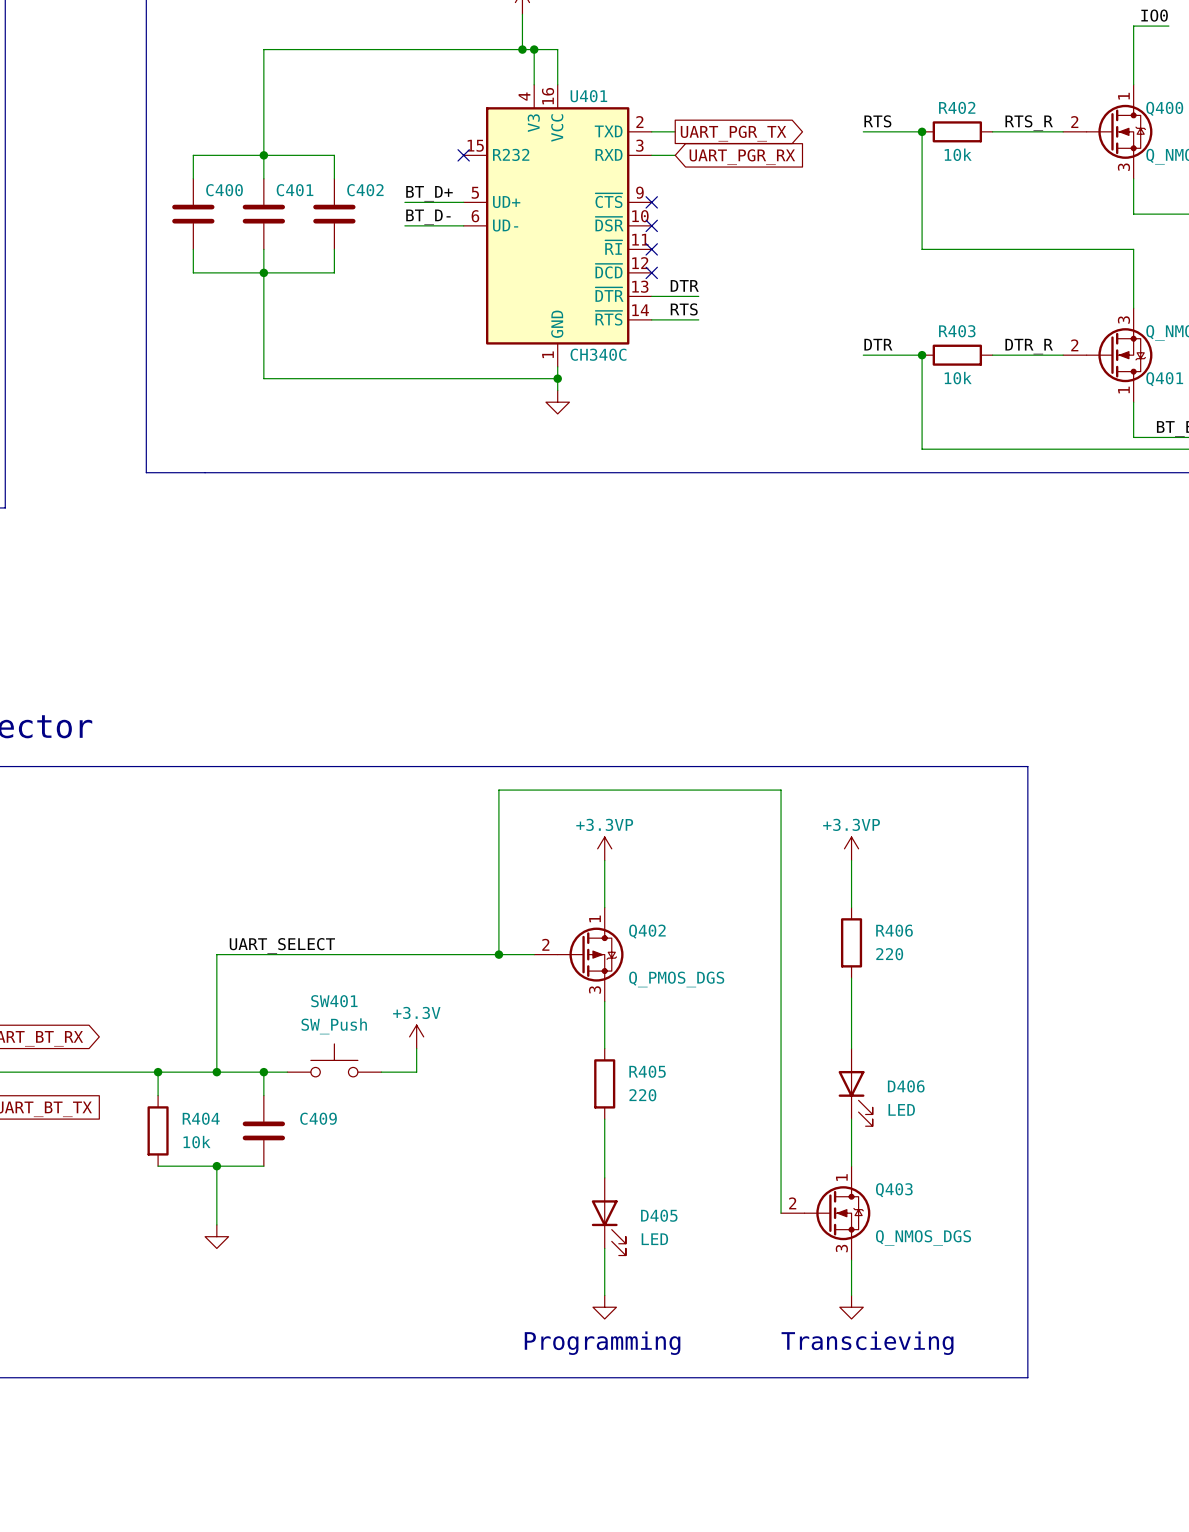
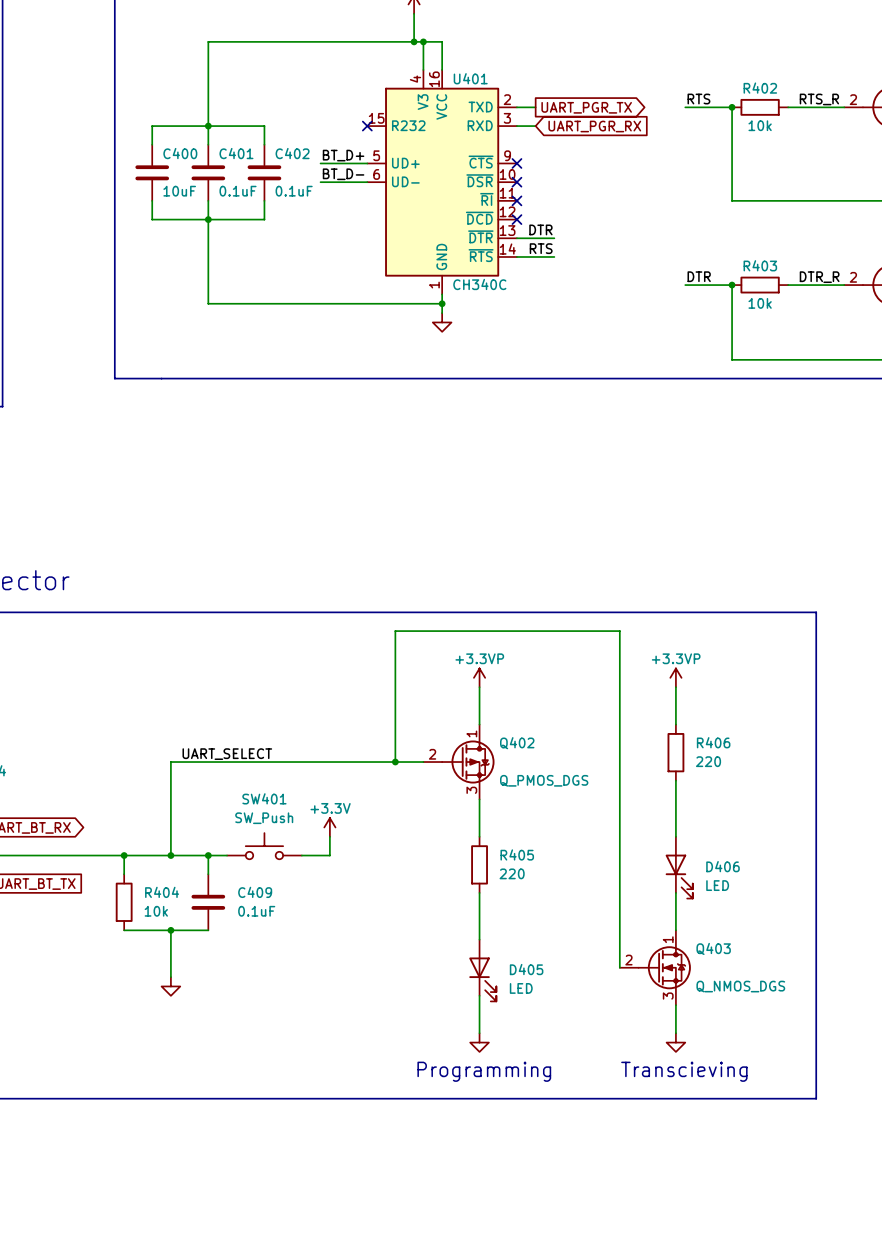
C400 value: none -> 10uF (179, 191)
C401 value: none -> 0.1uF (238, 191)
C402 value: none -> 0.1uF (294, 191)
C409 value: none -> 0.1uF (256, 911)

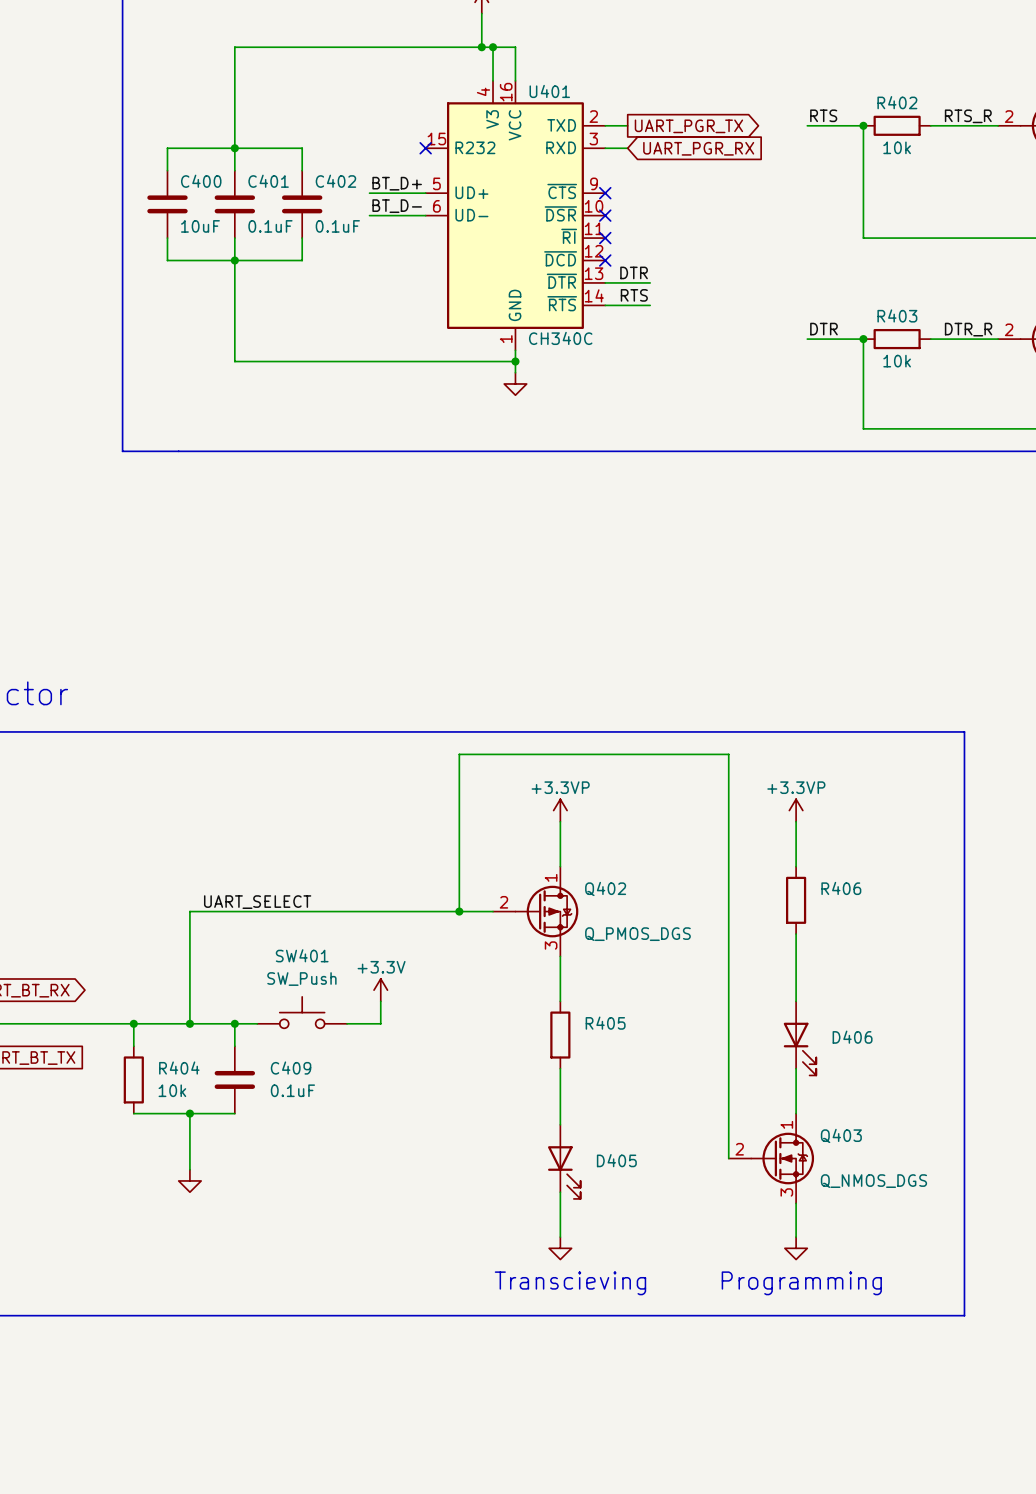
R406 value: 220 (708, 761) -> none
R405 value: 220 (512, 873) -> none
D406 value: LED (717, 885) -> none
D405 value: LED (521, 988) -> none
text: Programming (484, 1071) -> none
text: none -> Transcieving (570, 1283)
text: none -> Programming (801, 1283)
text: Transcieving (684, 1071) -> none

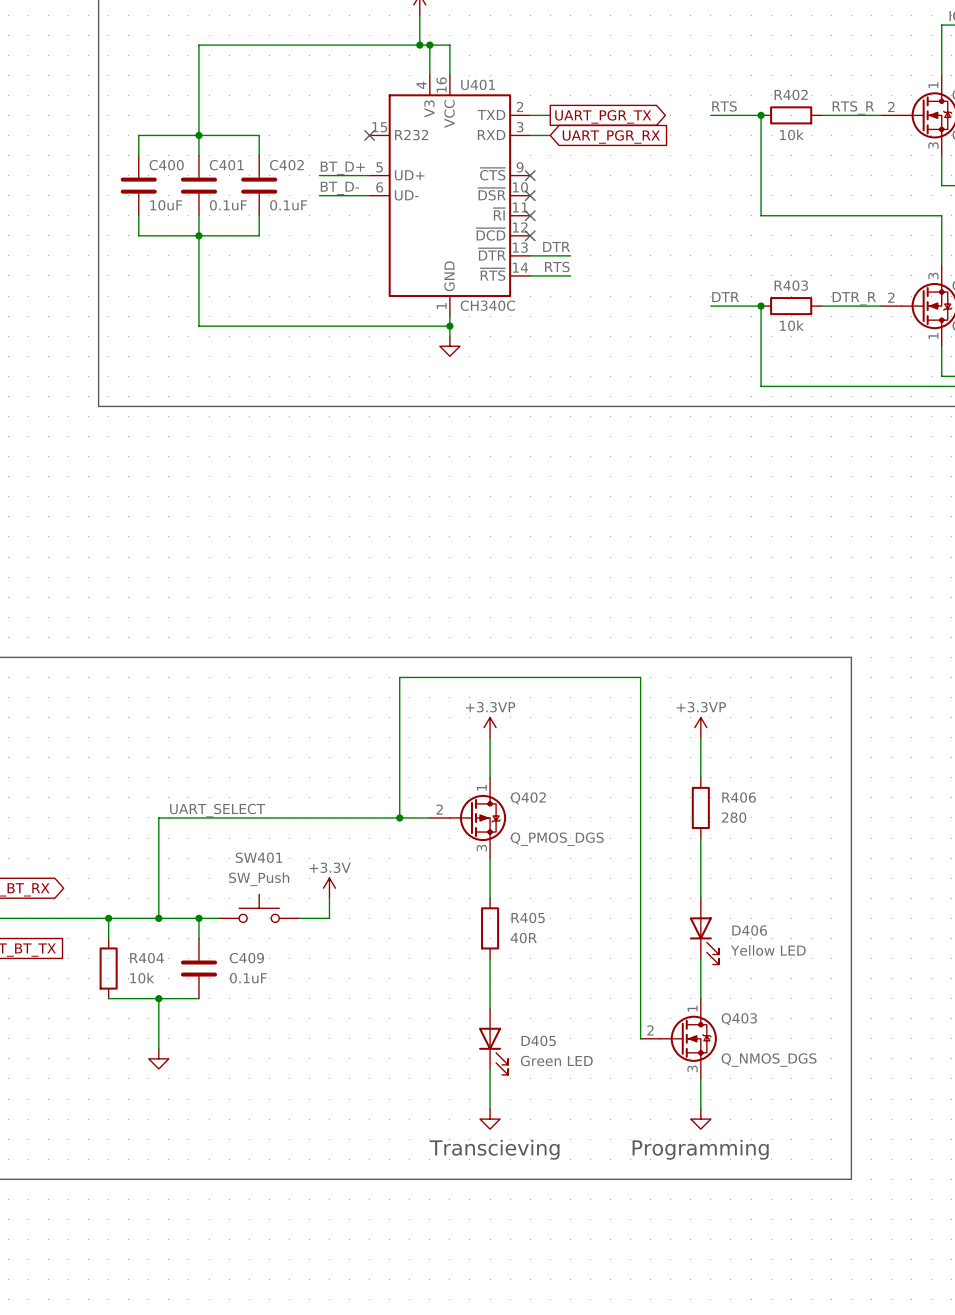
R406 value: none -> 280 (734, 817)
R405 value: none -> 40R (523, 938)
D406 value: none -> Yellow LED (768, 950)
D405 value: none -> Green LED (556, 1061)

